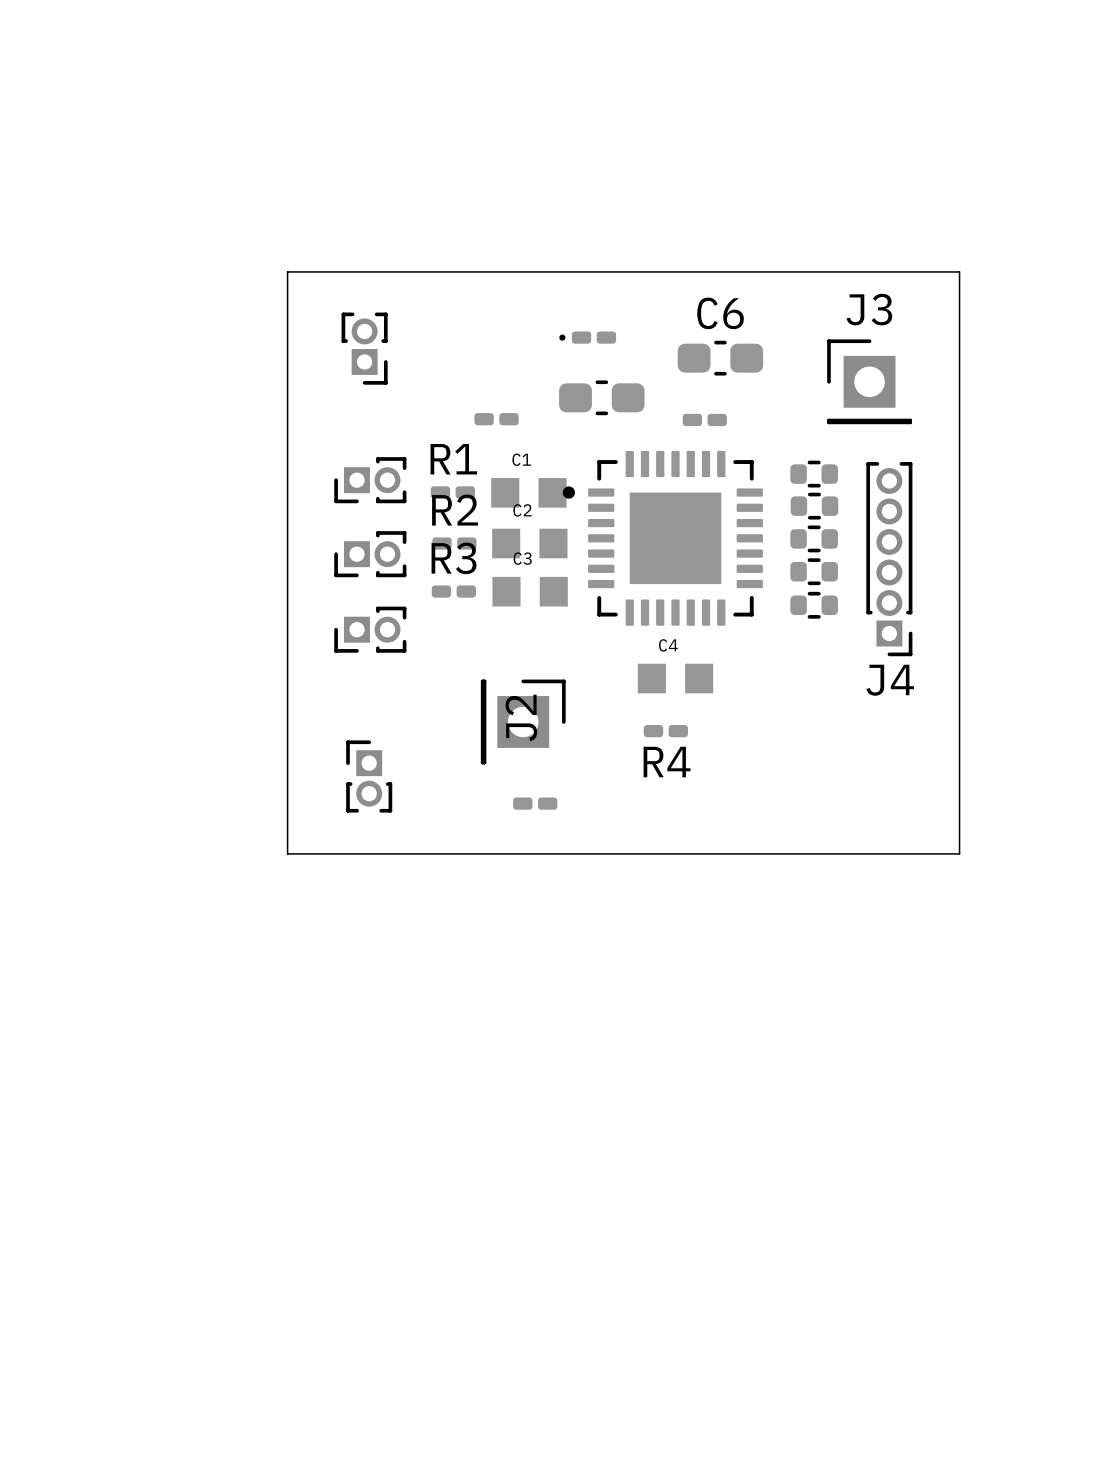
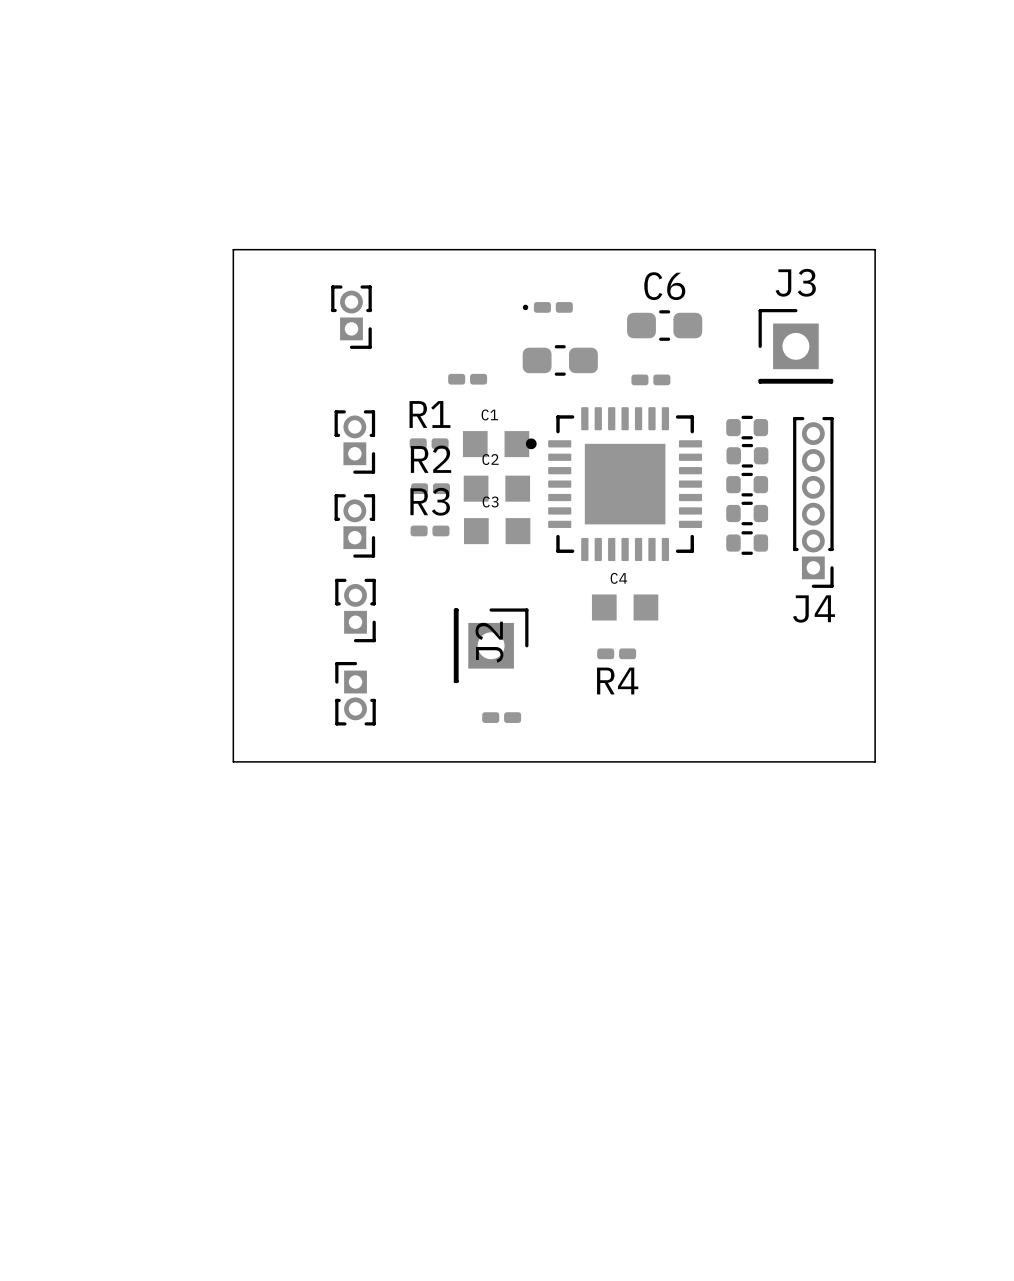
board edge: (287, 271) (287, 853) -> (283, 249) (233, 249) (233, 761) (283, 761)
part rotation: 0° (370, 480) -> 90° counterclockwise (354, 442)
part: (370, 554) -> none
part: none -> (354, 525)
part: (370, 629) -> none
part: none -> (355, 610)

